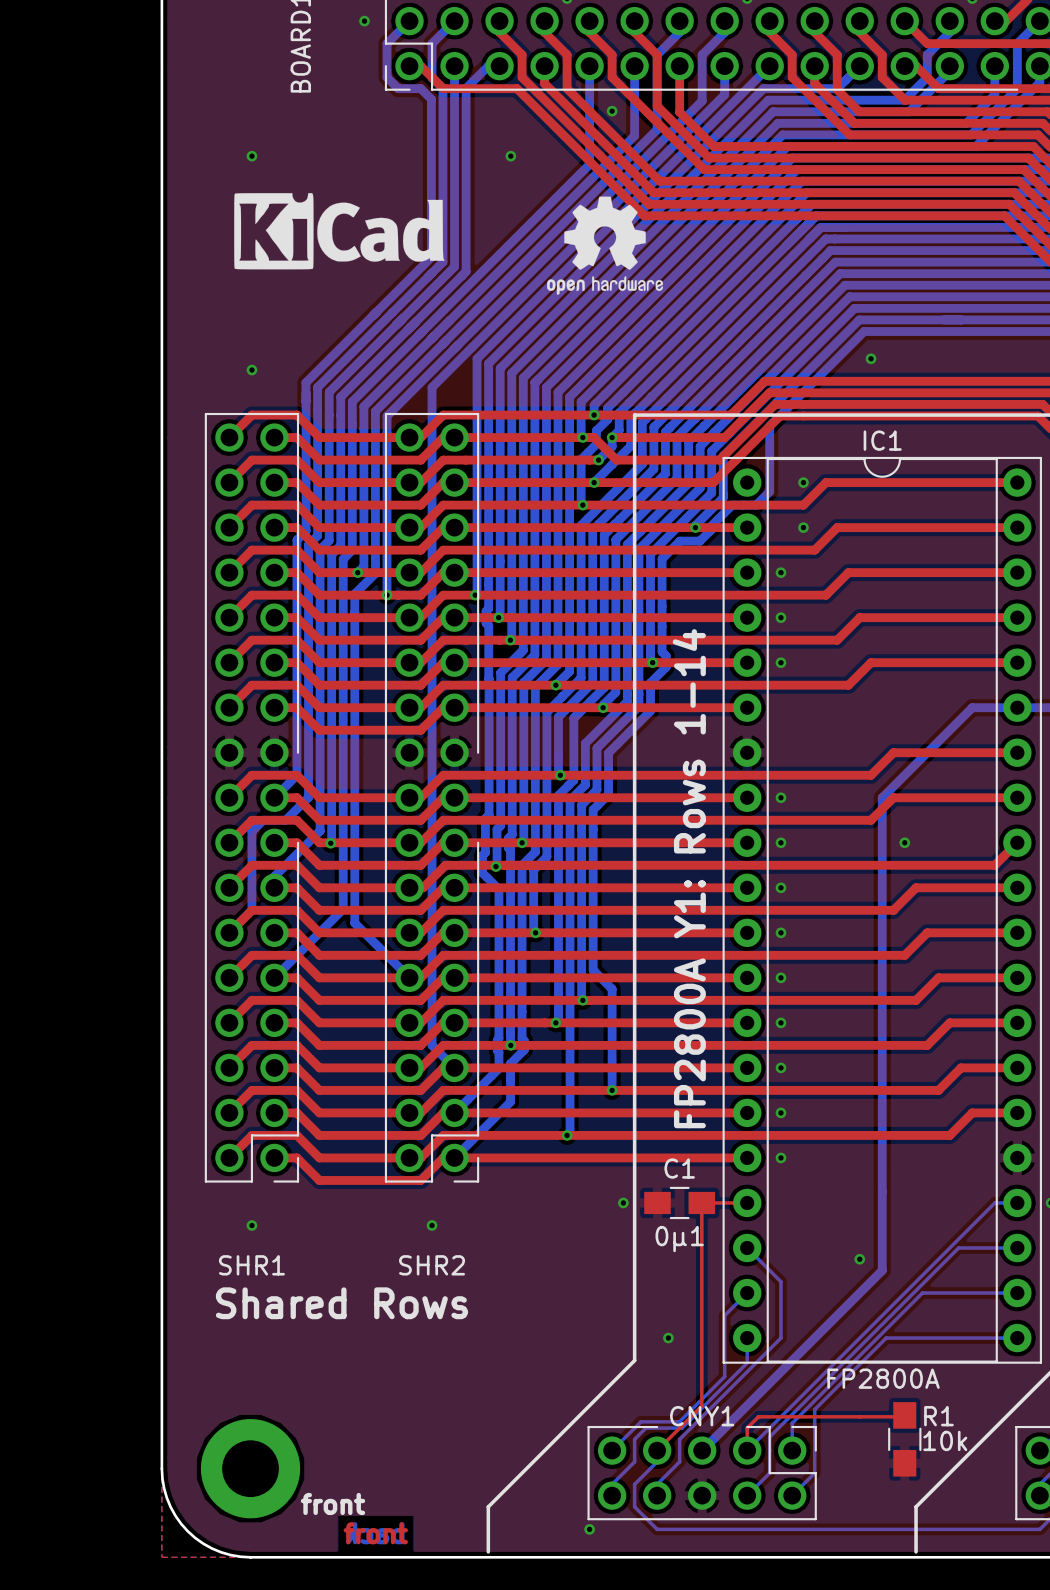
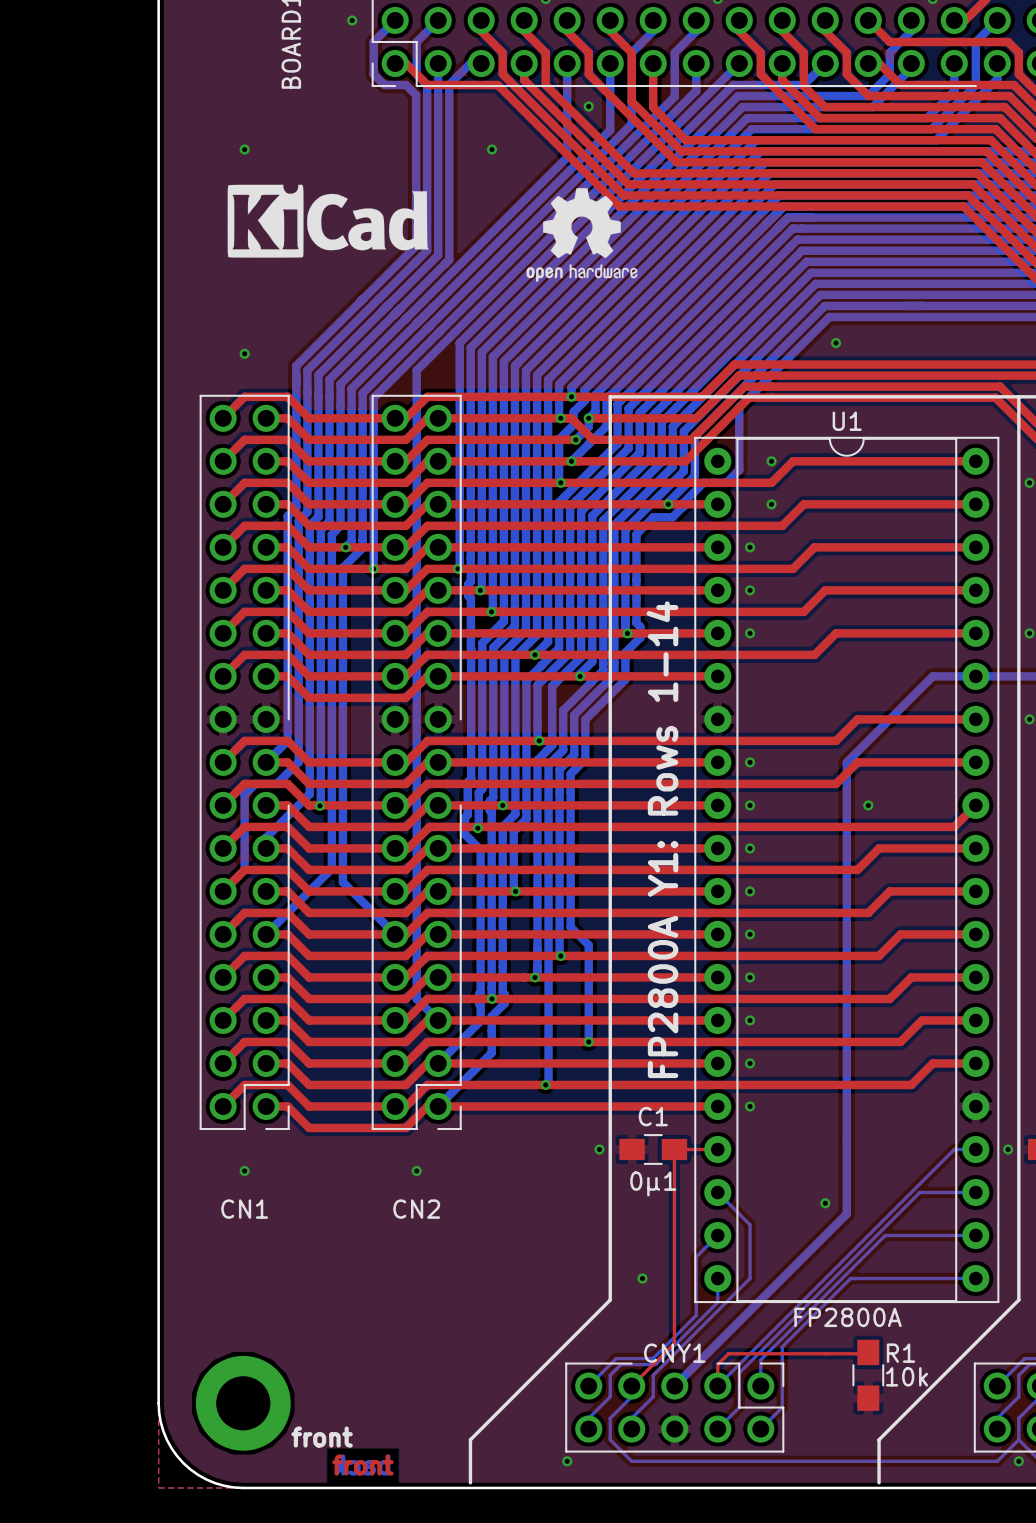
IC1 name: IC1 (882, 440) -> U1 (847, 421)
SHR1 name: SHR1 (251, 1265) -> CN1 (244, 1209)
SHR2 name: SHR2 (432, 1265) -> CN2 (416, 1209)
text: Shared Rows (341, 1303) -> none

